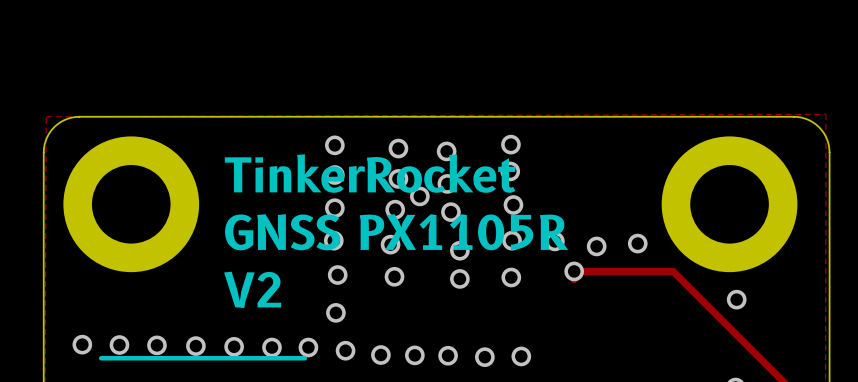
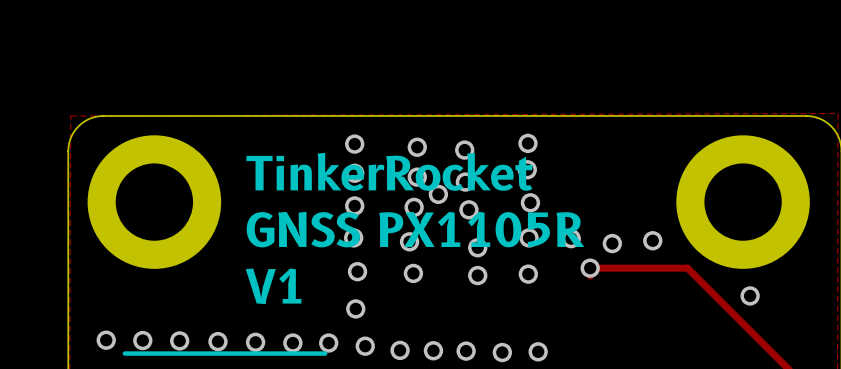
text: V2 (252, 289) -> V1 (273, 286)

